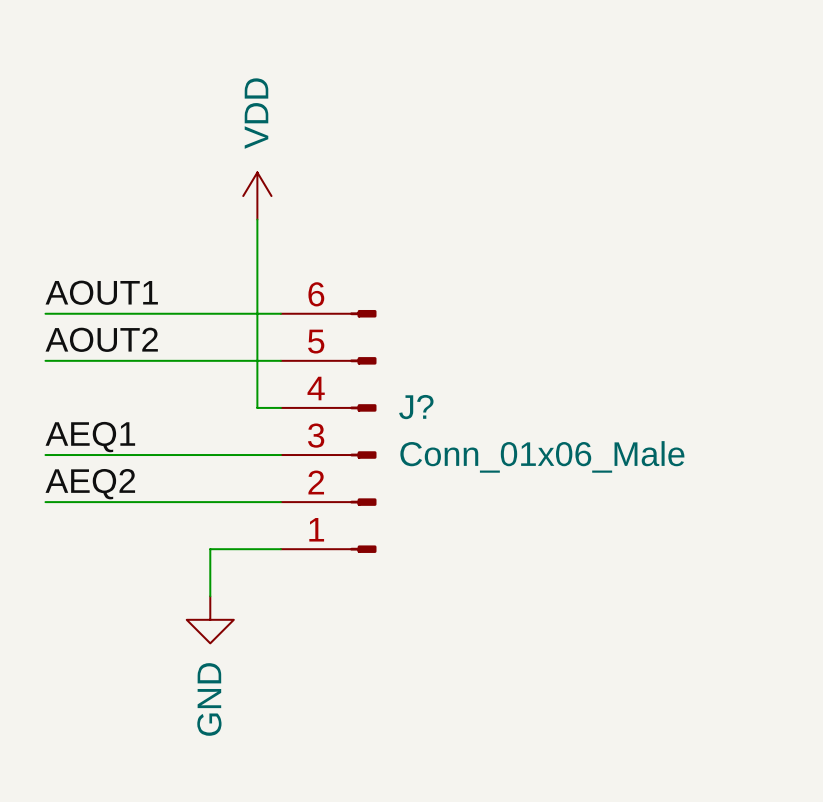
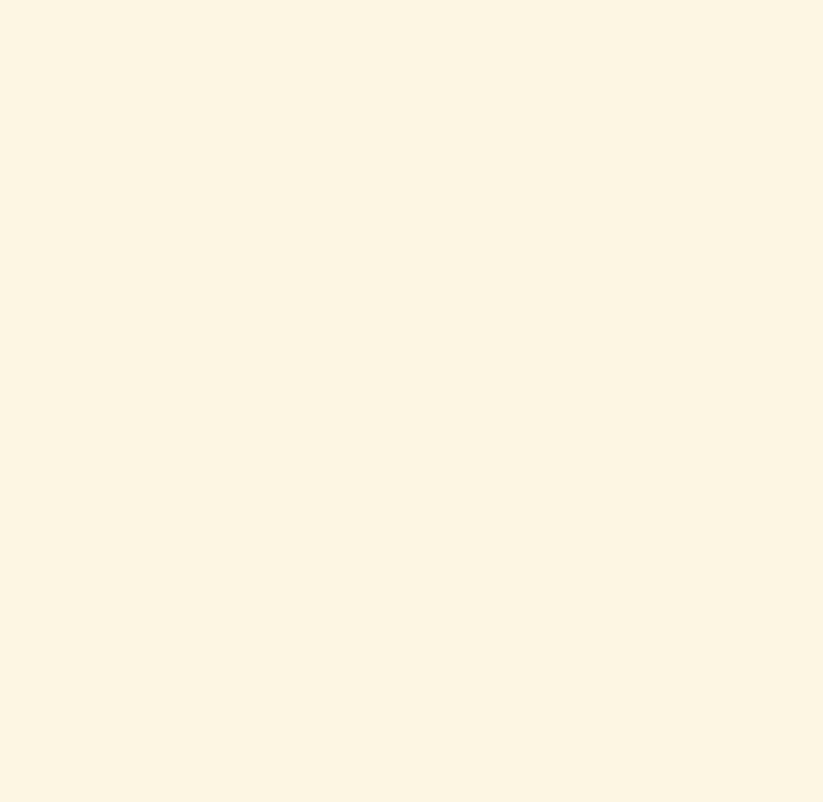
power symbol: VDD (257, 196) -> none
wire: (257, 219) (257, 407) (280, 407) -> none
label: AOUT1 (101, 292) -> none
wire: (45, 313) (280, 313) -> none
label: AOUT2 (101, 339) -> none
wire: (45, 360) (280, 360) -> none
J?: Conn_01x06_Male (328, 431) -> none
label: AEQ1 (90, 437) -> none
wire: (45, 455) (280, 455) -> none
label: AEQ2 (90, 484) -> none
wire: (45, 502) (280, 502) -> none
wire: (280, 549) (210, 549) (210, 596) -> none
power symbol: GND (210, 619) -> none

